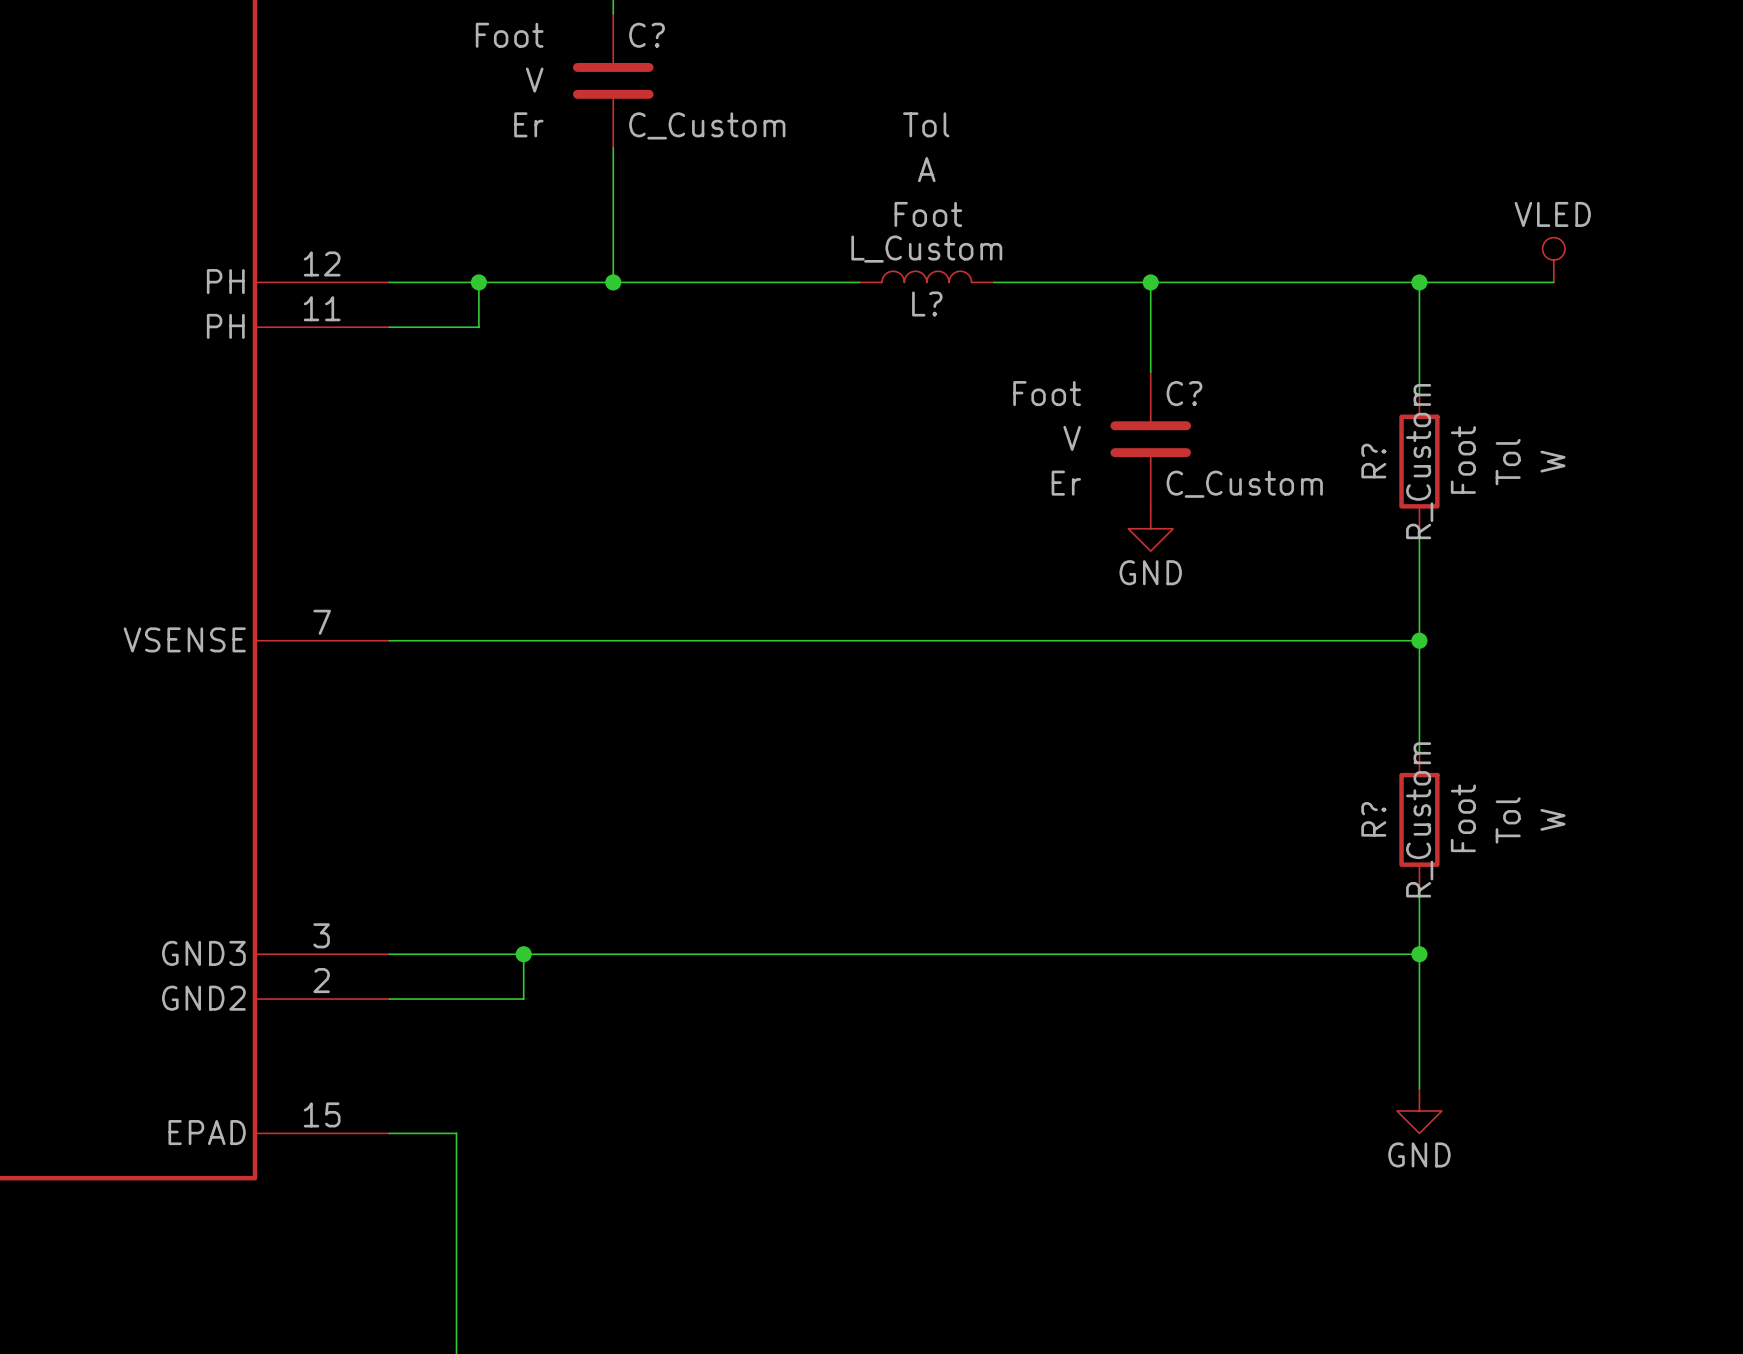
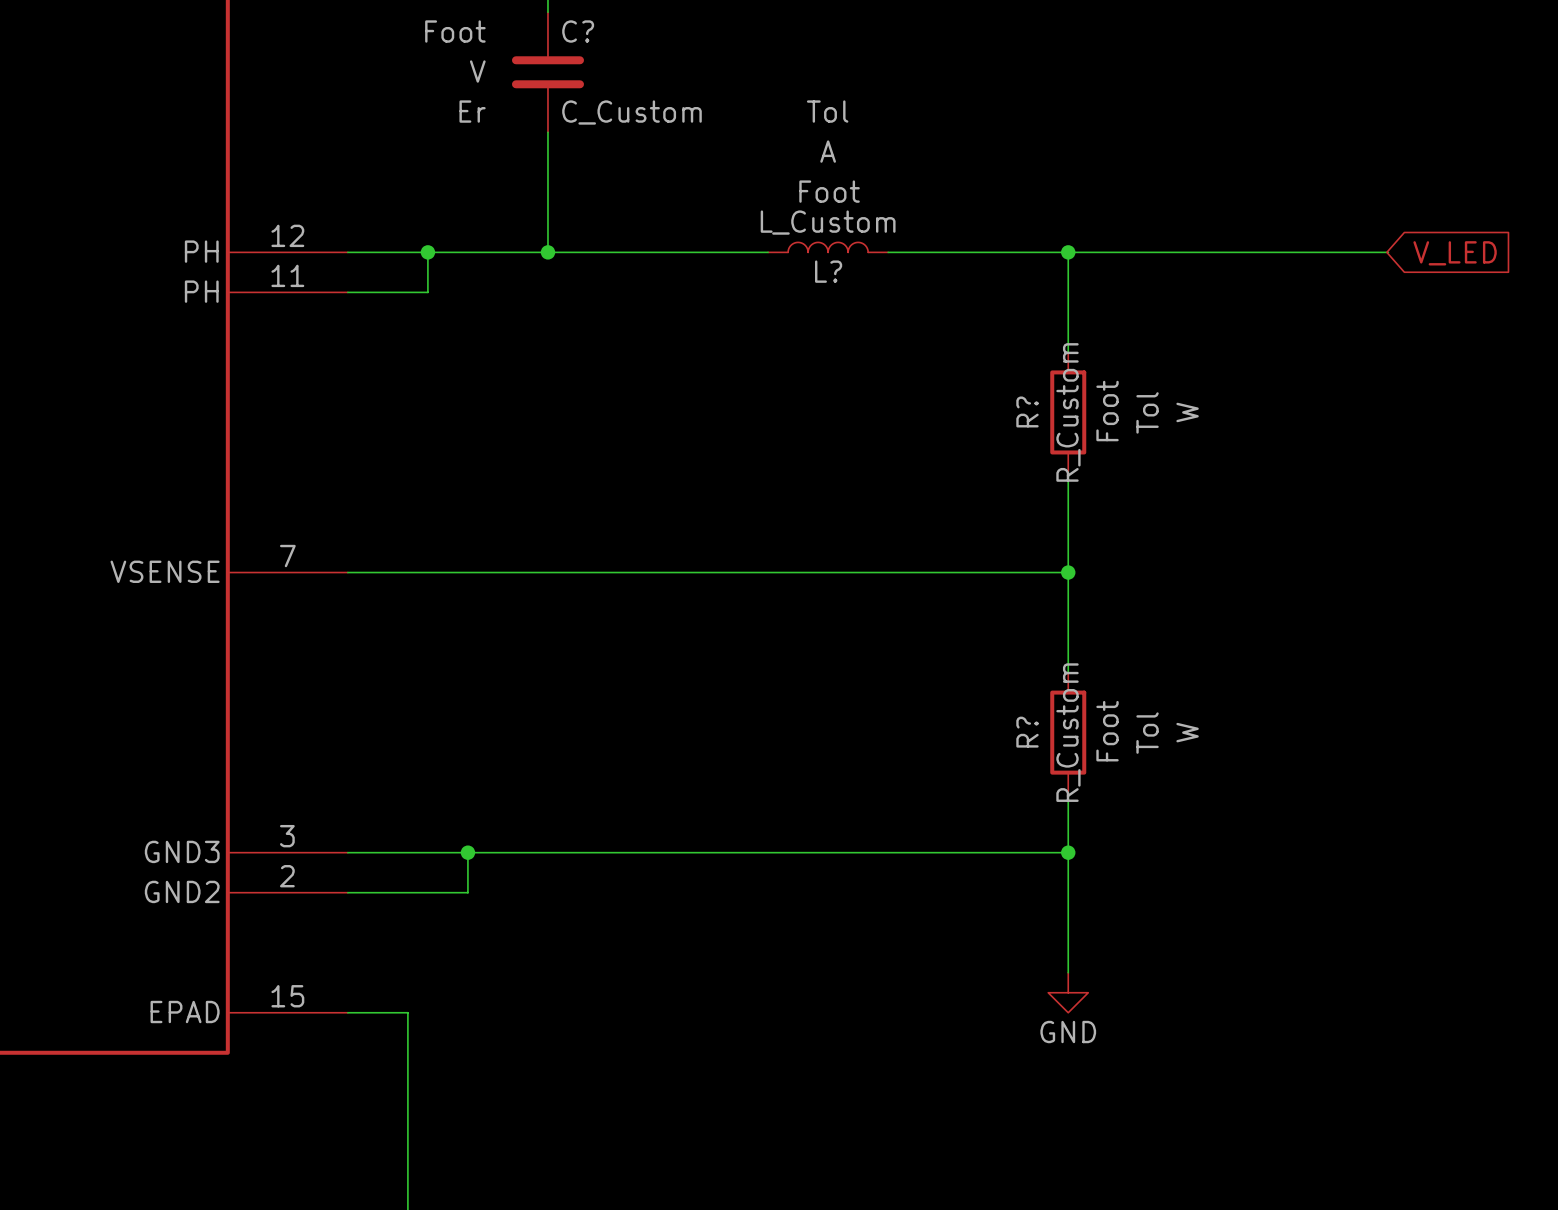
power symbol: VLED (1553, 260) -> none
wire: (1150, 282) (1150, 372) -> none
junction position: (1150, 282) -> (1068, 252)
wire: (1419, 282) (1419, 394) -> (1068, 252) (1068, 352)
junction: (1419, 282) -> none
global label: none -> V_LED (1455, 253)
C?: C_Custom (1150, 439) -> none
R?: none -> R_Custom (1068, 412)
R?: R_Custom (1419, 461) -> none
power symbol: GND (1150, 528) -> none
wire: (1419, 528) (1419, 752) -> (1068, 472) (1068, 672)
wire: (1195, 640) (1419, 640) -> none
junction: none -> (1068, 572)
junction: (1419, 640) -> none
R?: none -> R_Custom (1068, 732)
R?: R_Custom (1419, 819) -> none
wire: (1419, 887) (1419, 1088) -> (1068, 792) (1068, 972)
wire: (1195, 954) (1419, 954) -> none
junction: none -> (1068, 852)
junction: (1419, 954) -> none
power symbol position: GND (1419, 1111) -> GND (1068, 992)

